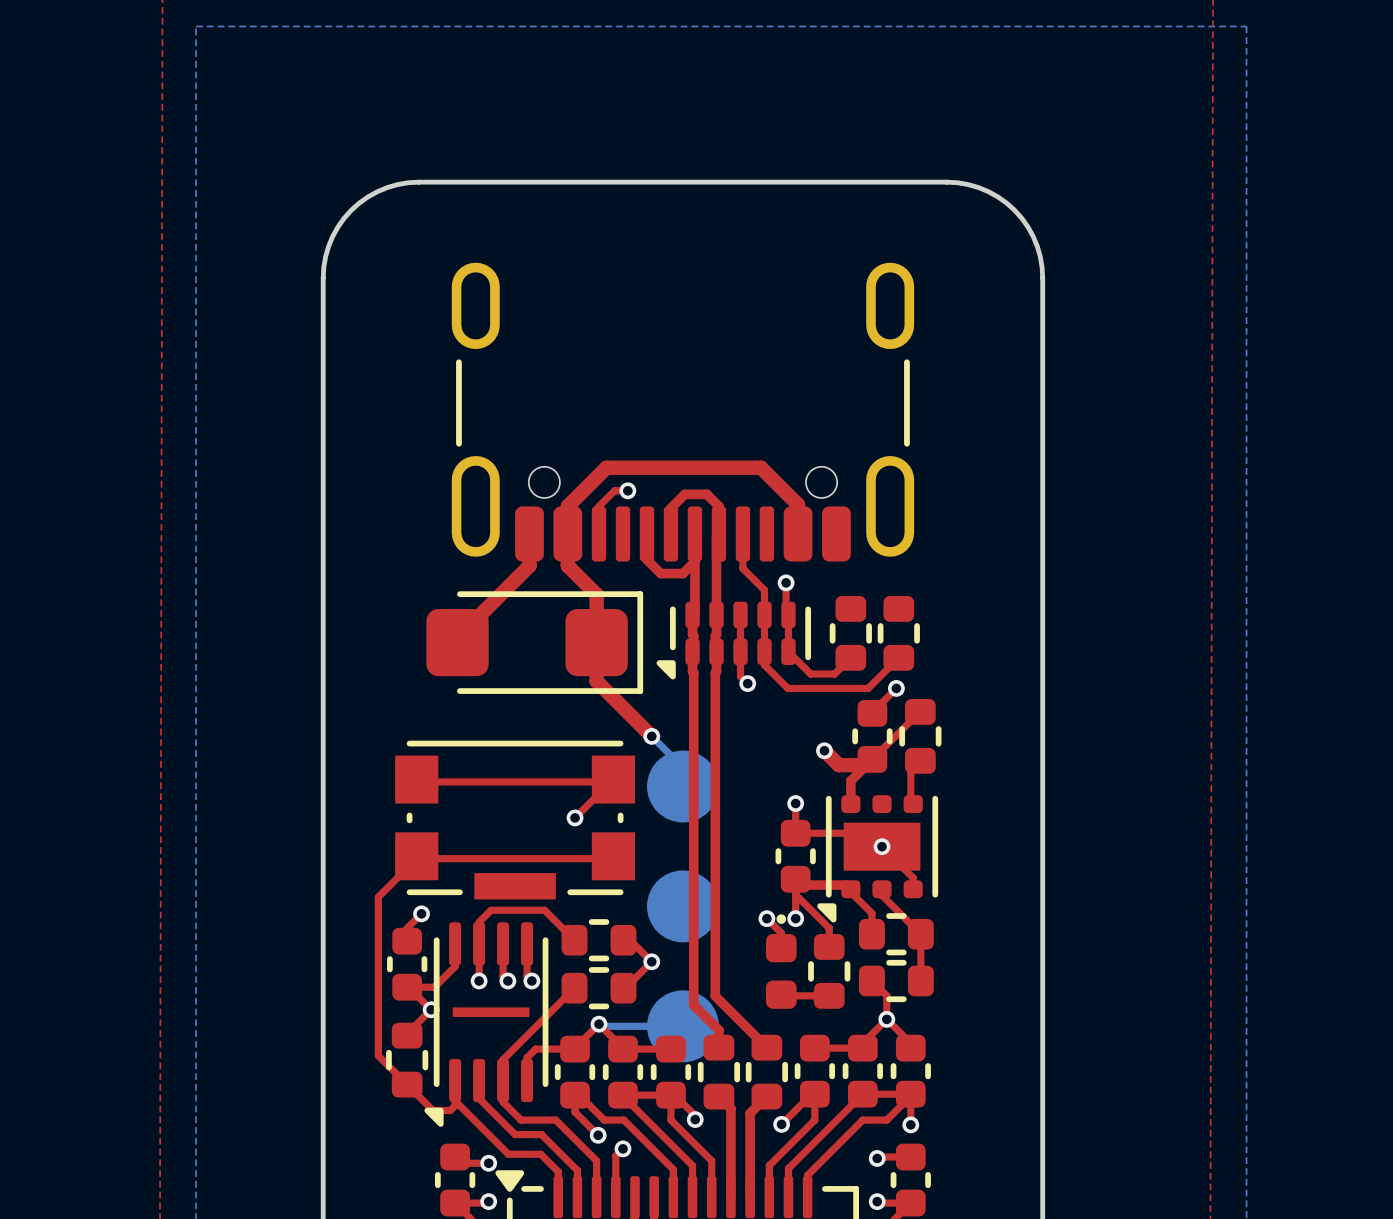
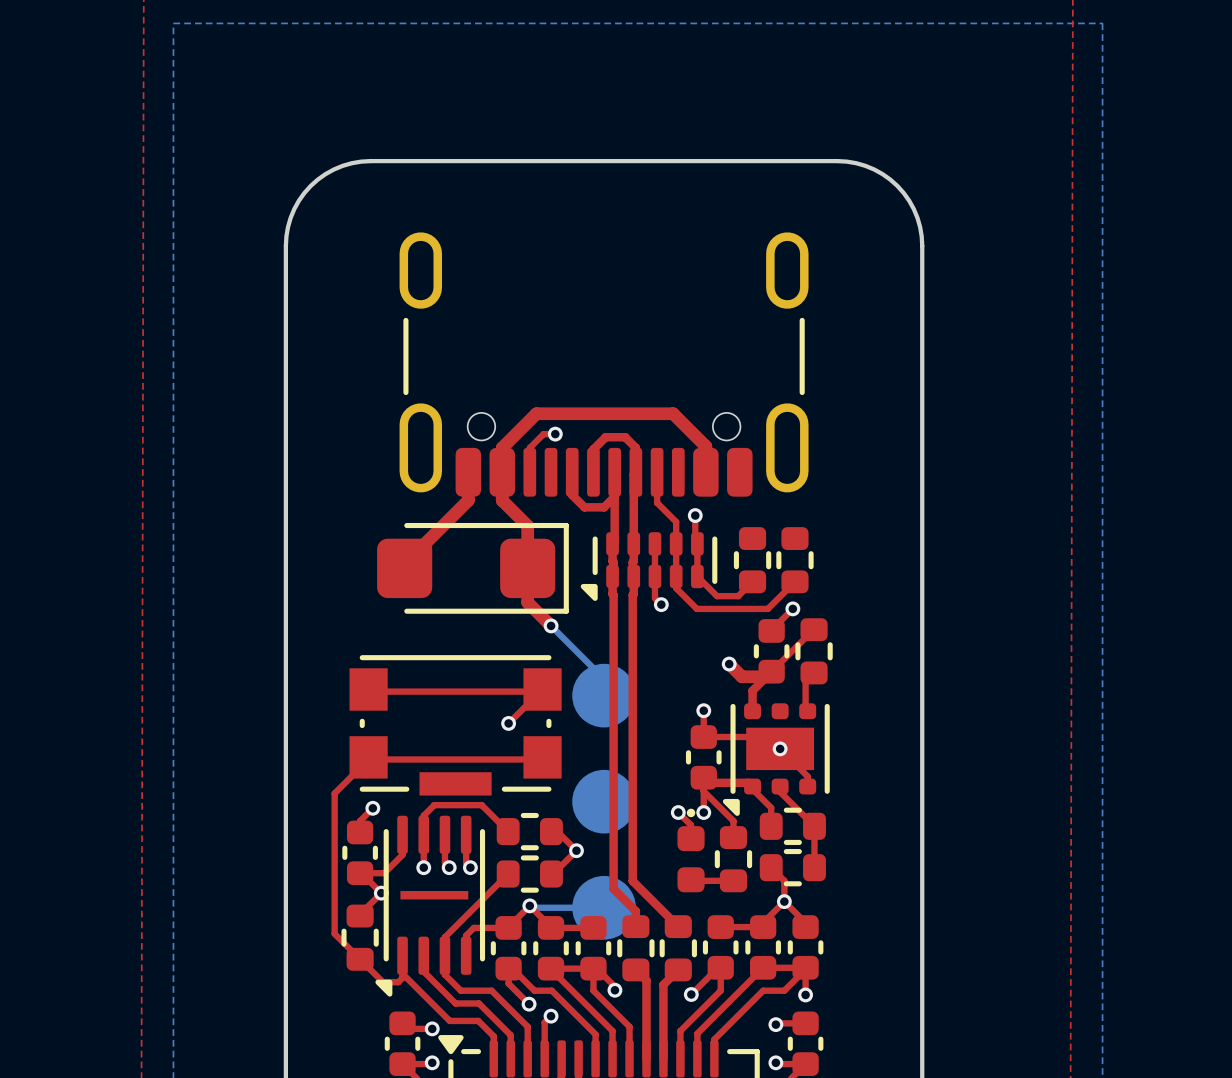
top track: (623, 707) (651, 736) -> none
bottom track: none -> (551, 625) (576, 651)
via position: (651, 736) -> (551, 625)

